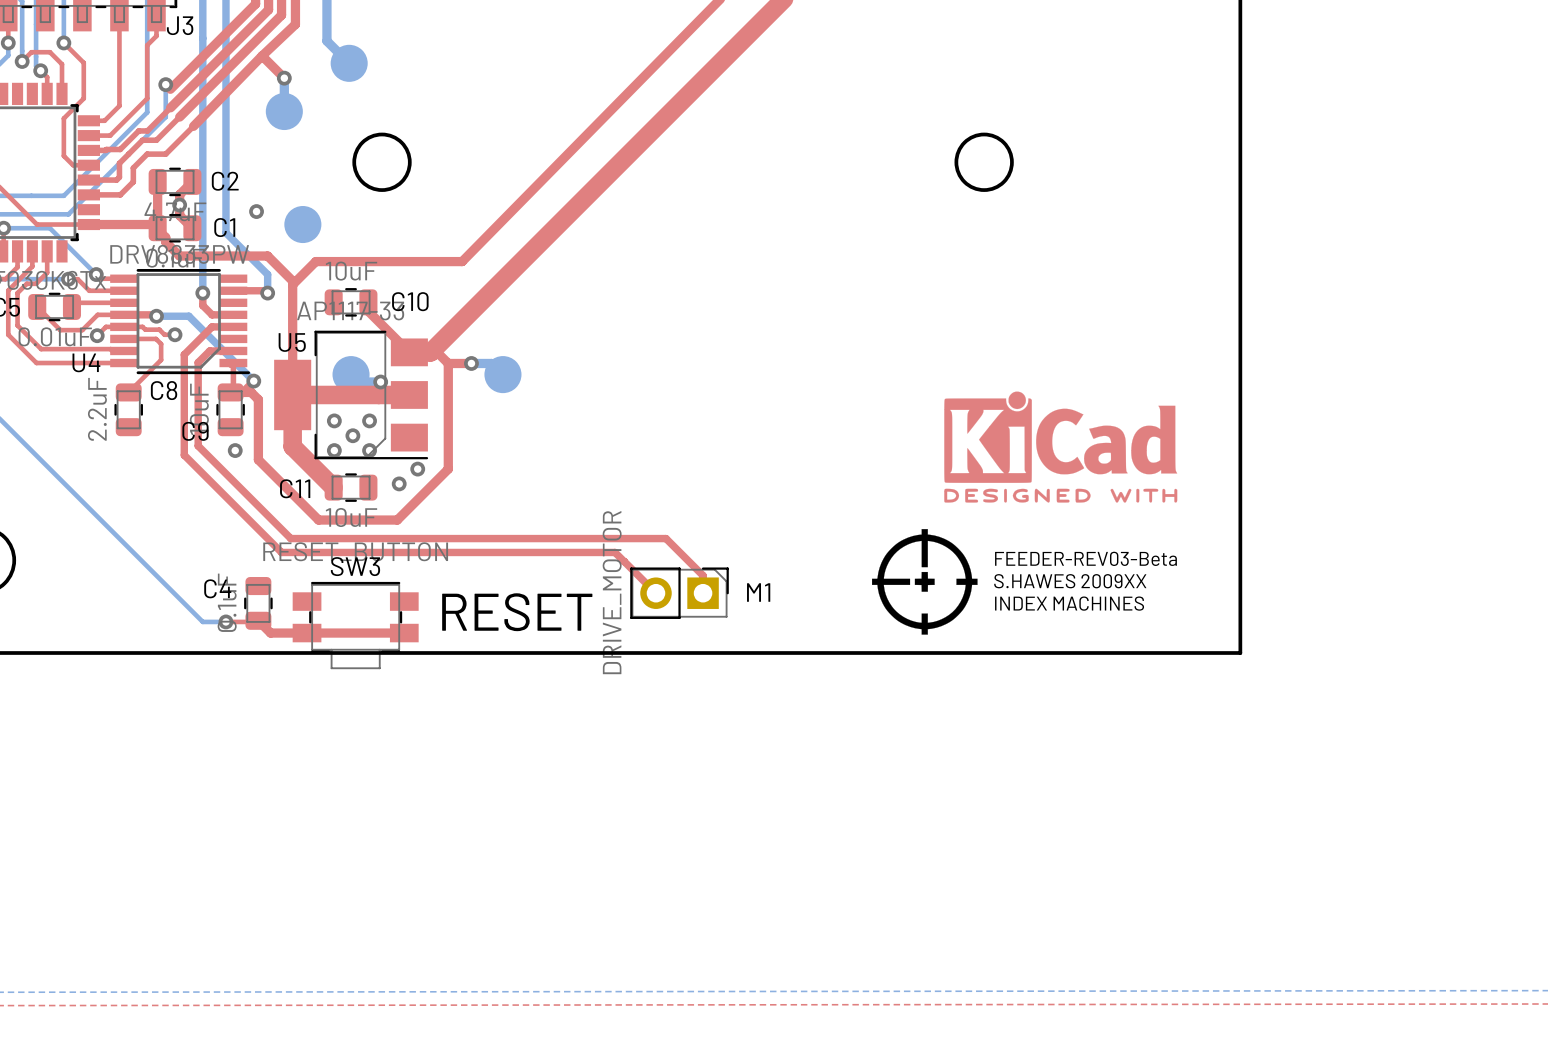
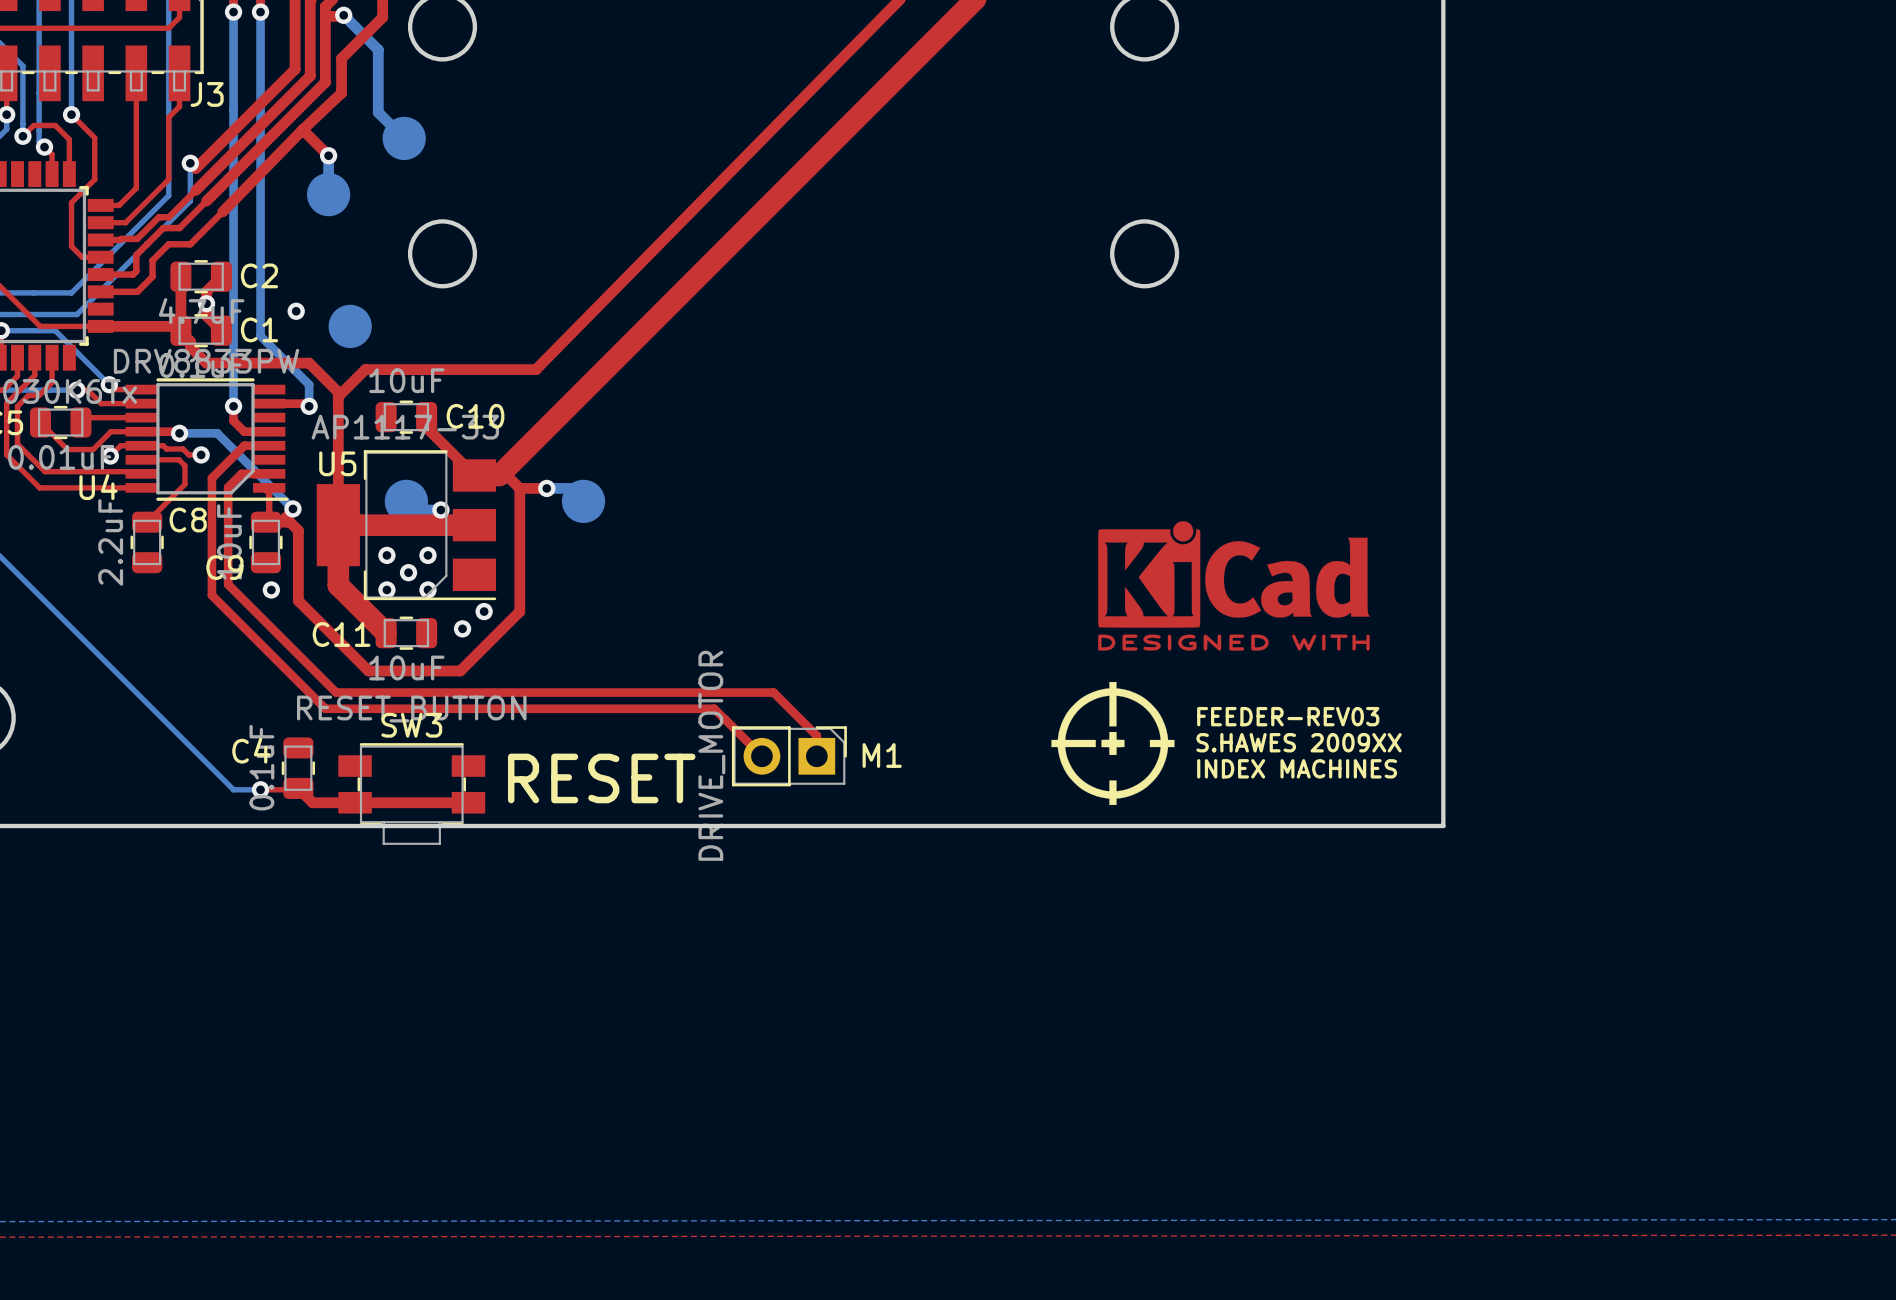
text: FEEDER-REV03-Beta (1085, 558) -> FEEDER-REV03 (1288, 716)
drawing position: (924, 581) -> (1112, 743)
text position: S.HAWES 2009XX (1070, 581) -> S.HAWES 2009XX (1299, 742)
text position: INDEX MACHINES (1069, 603) -> INDEX MACHINES (1297, 768)

